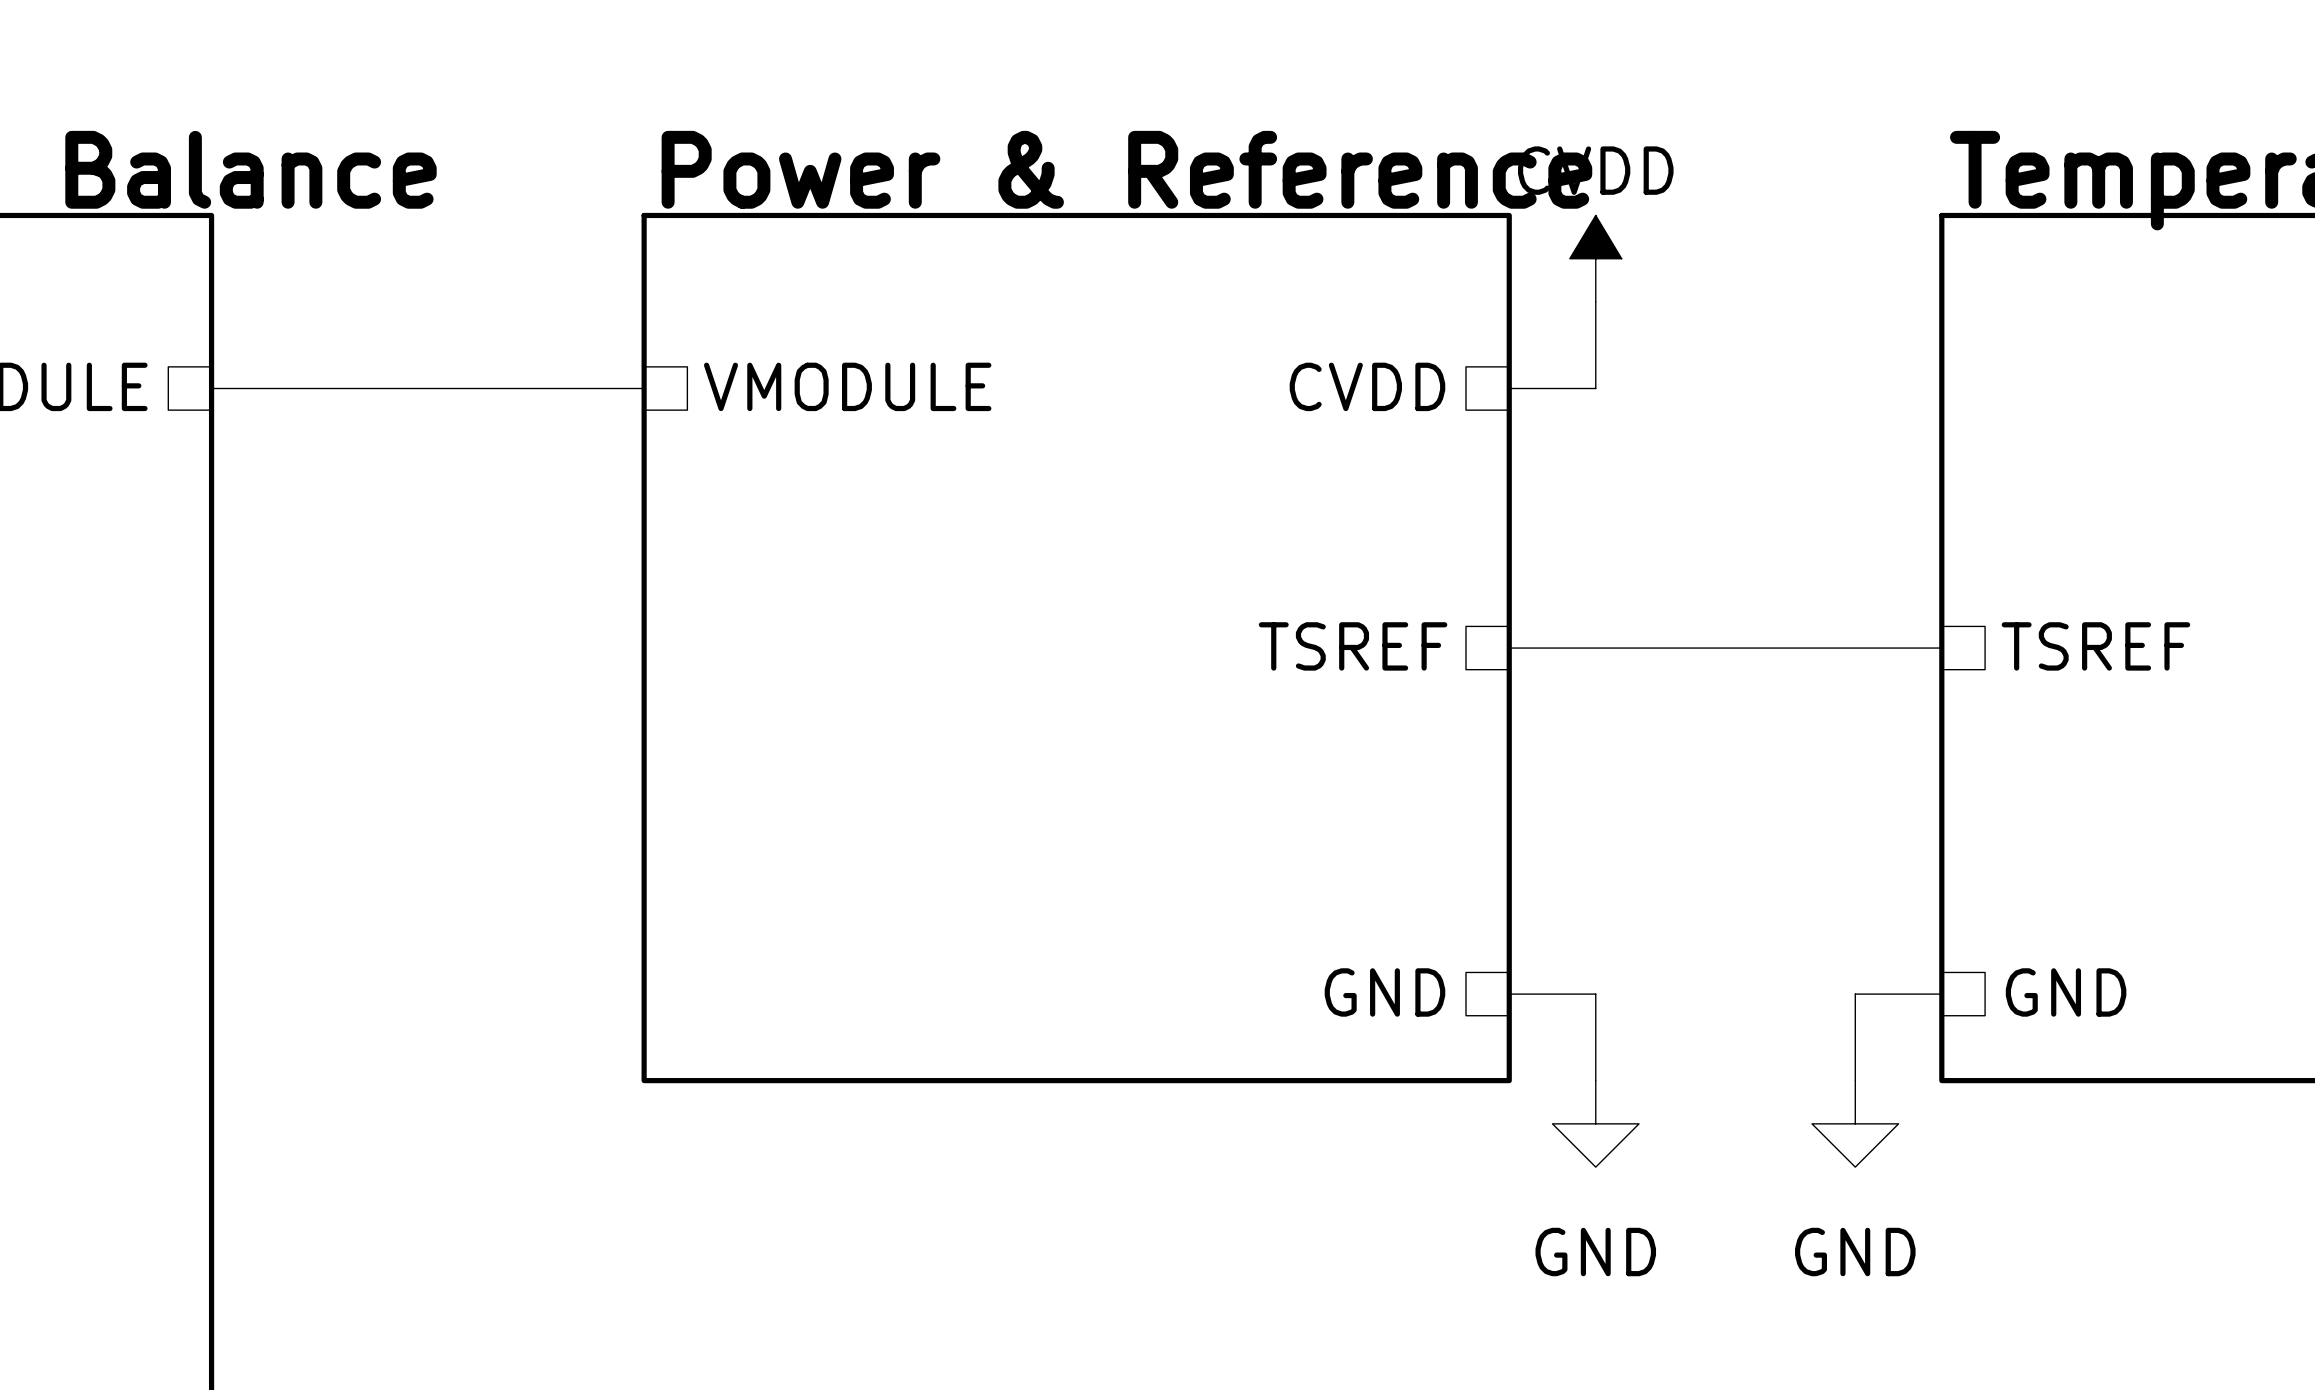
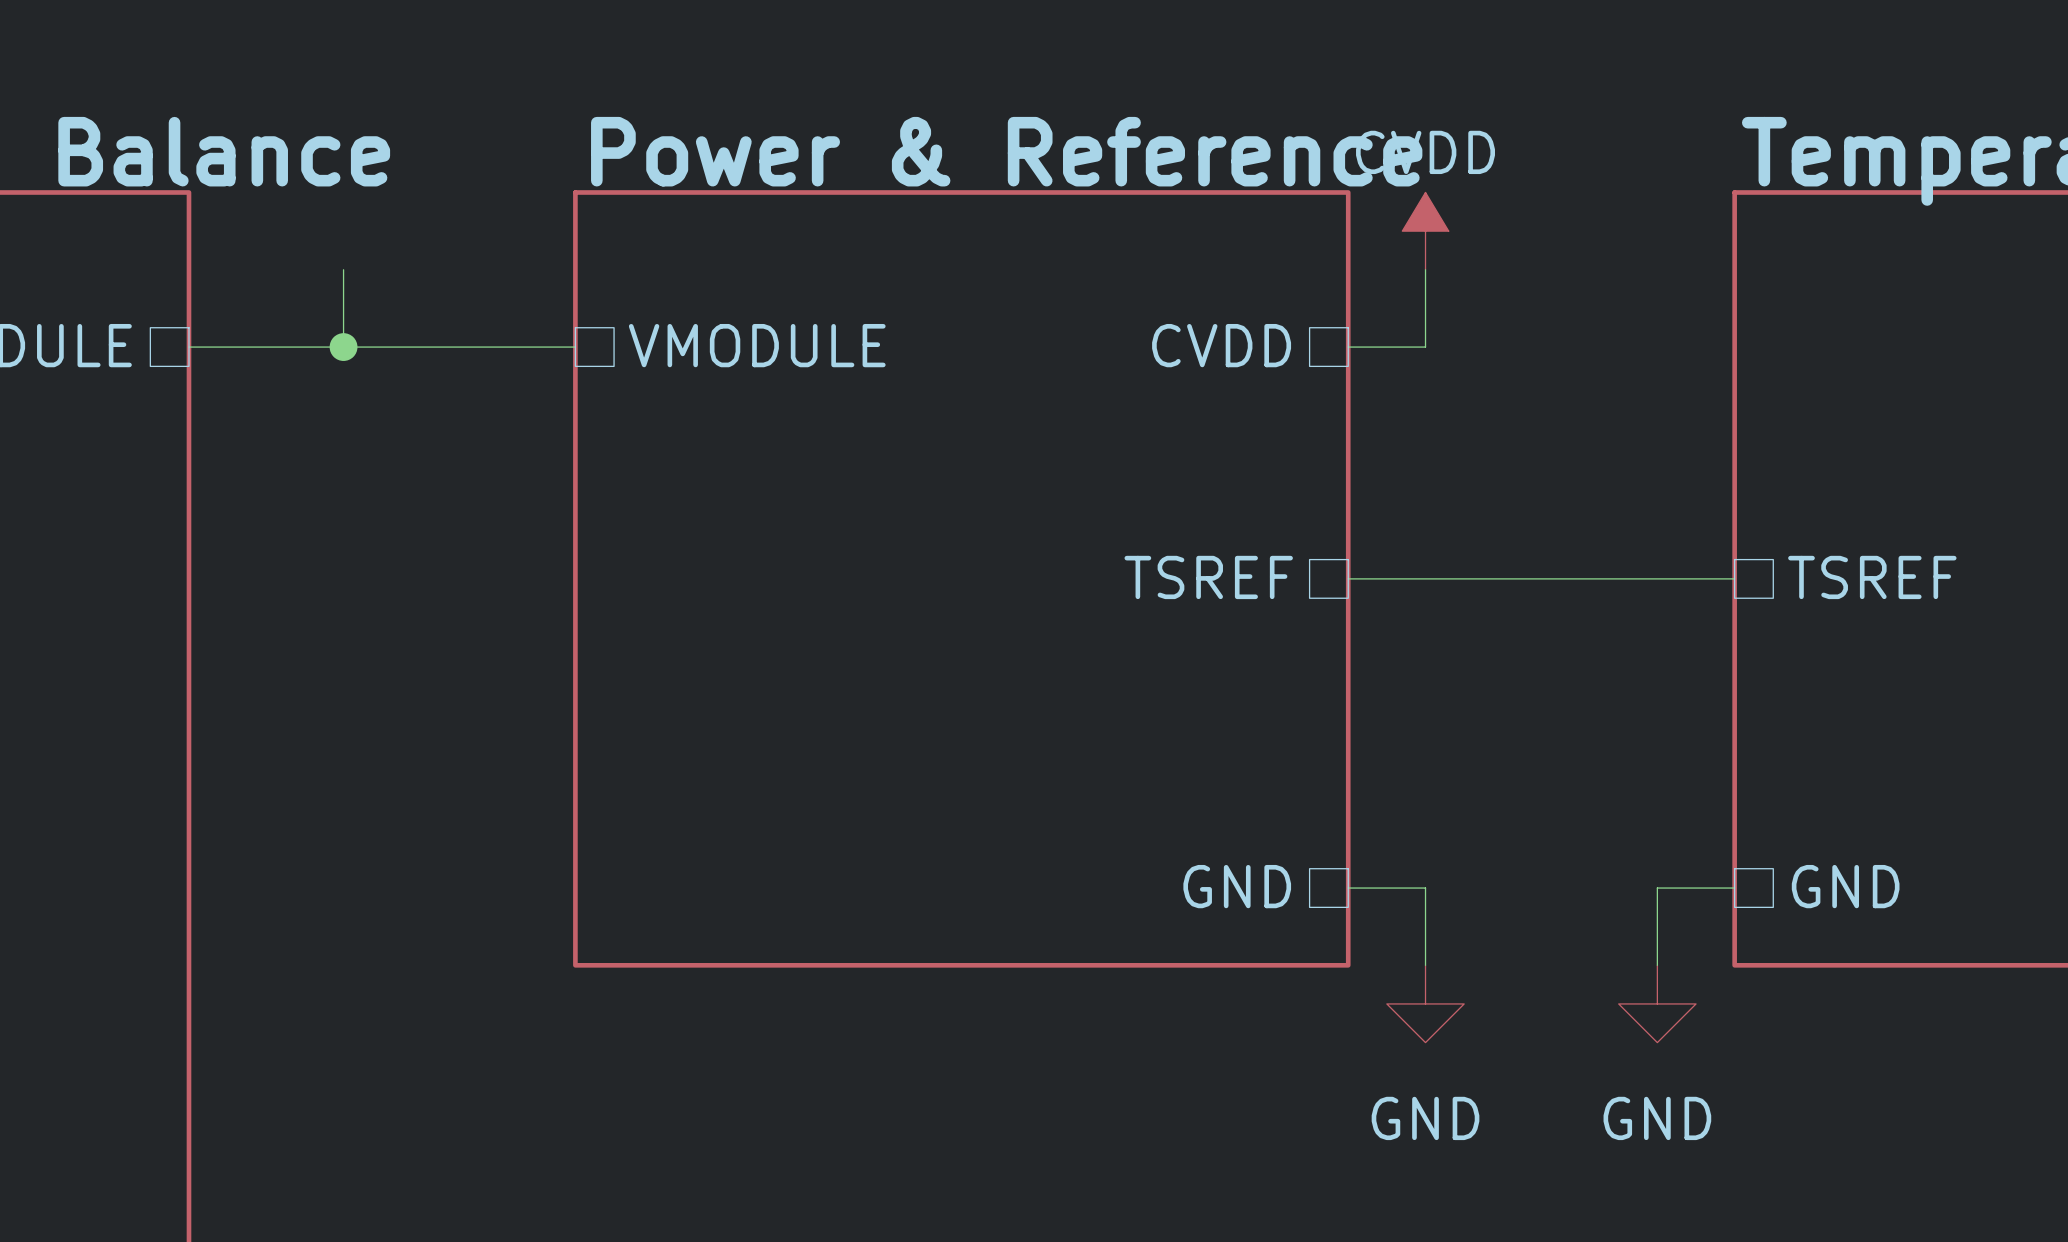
wire: none -> (343, 269) (343, 347)
junction: none -> (343, 347)

